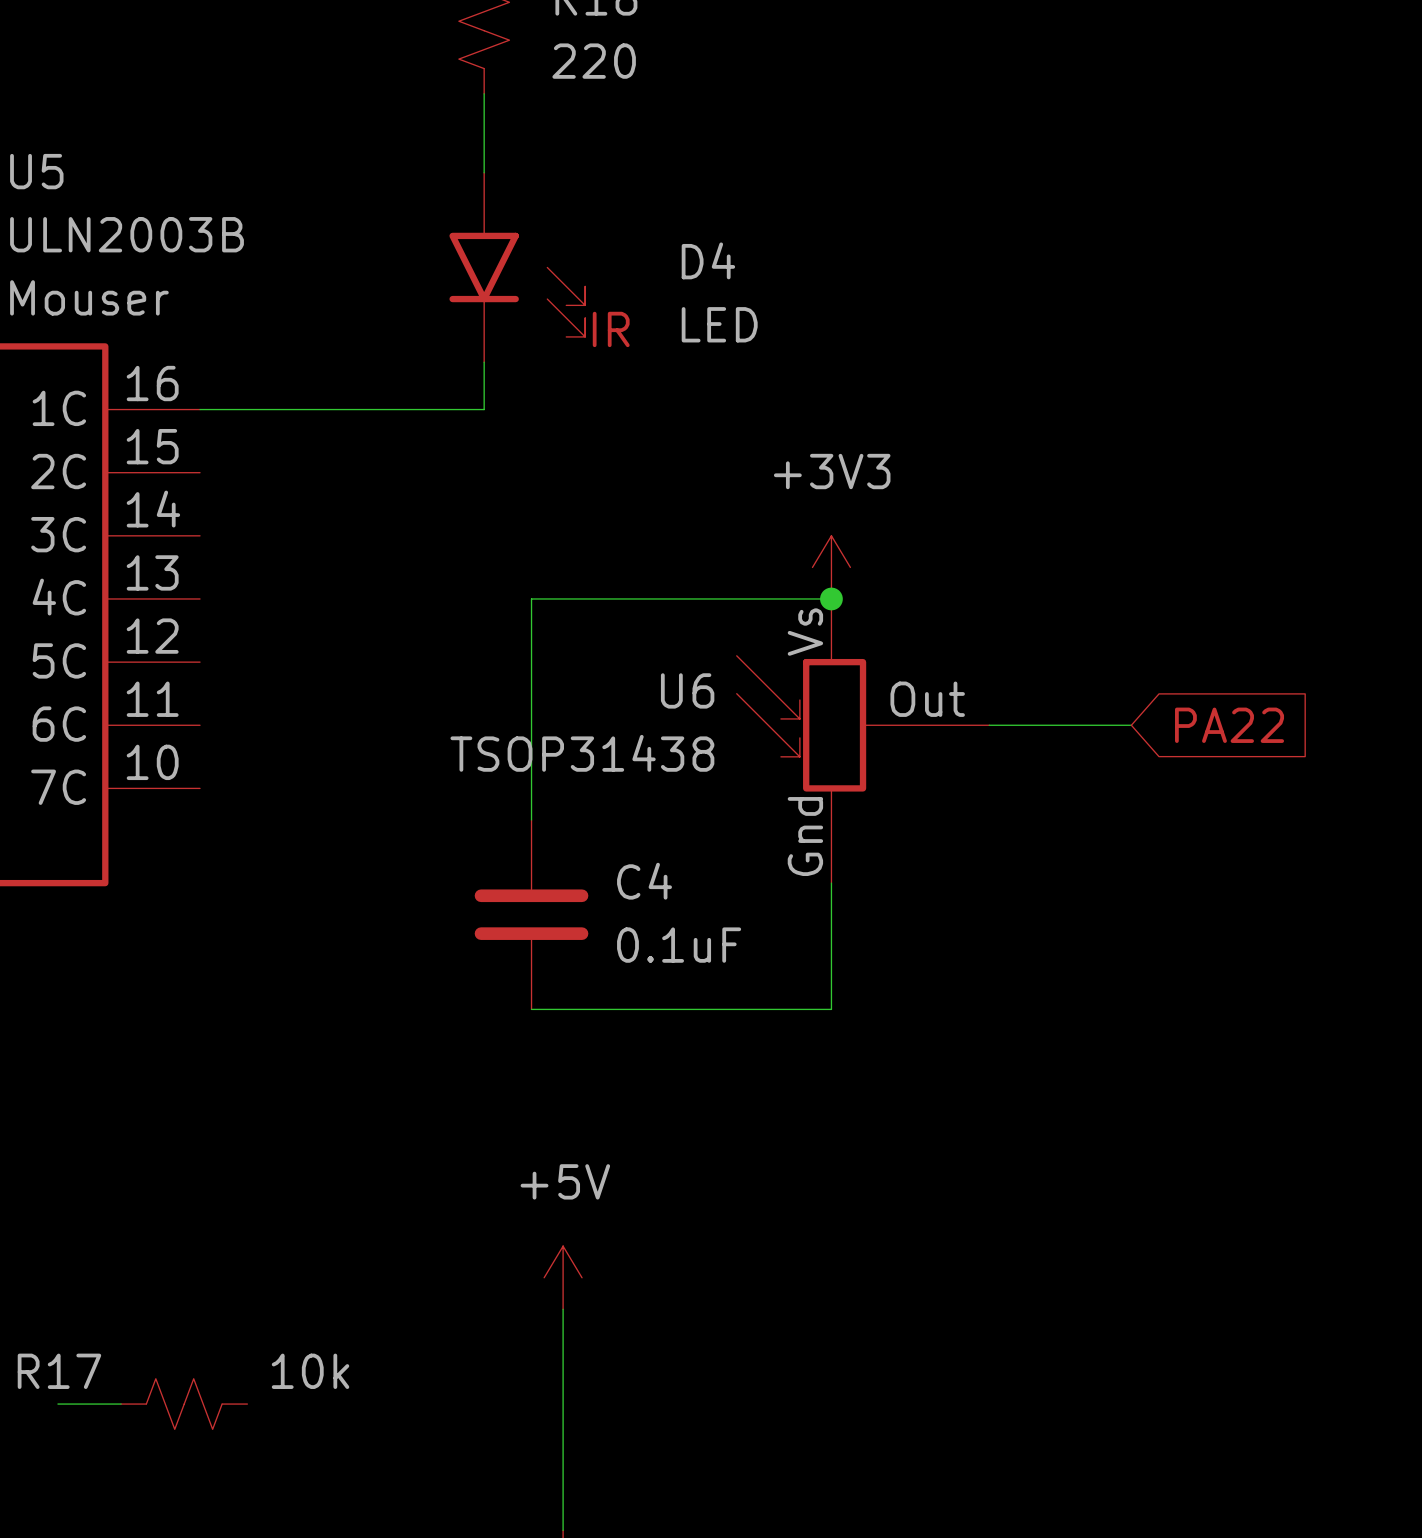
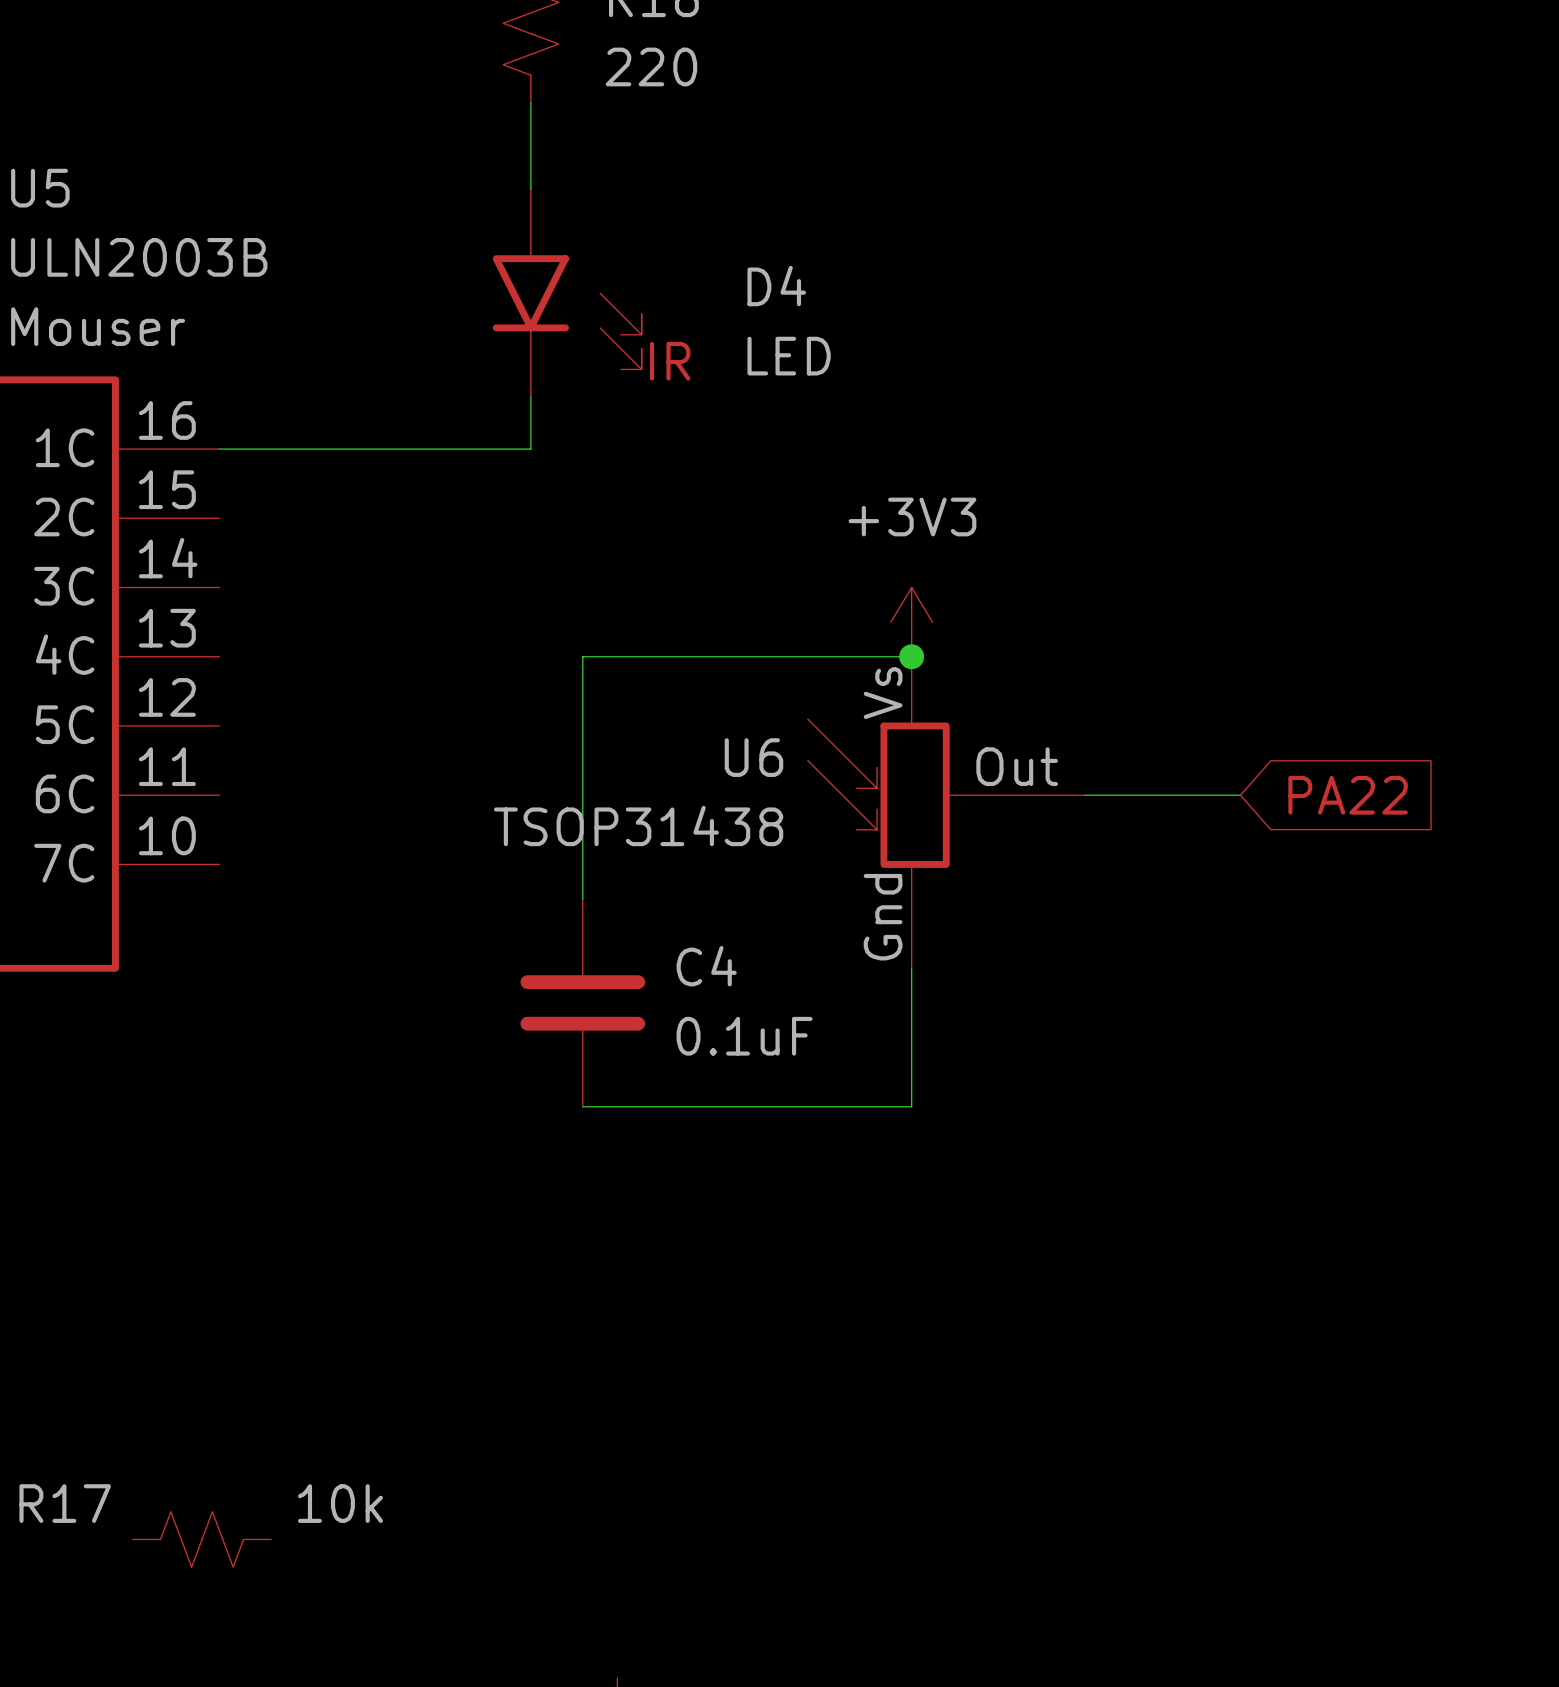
power symbol: +5V (563, 1277) -> none
wire: (563, 1309) (563, 1530) -> none
wire: (57, 1404) (121, 1404) -> none

